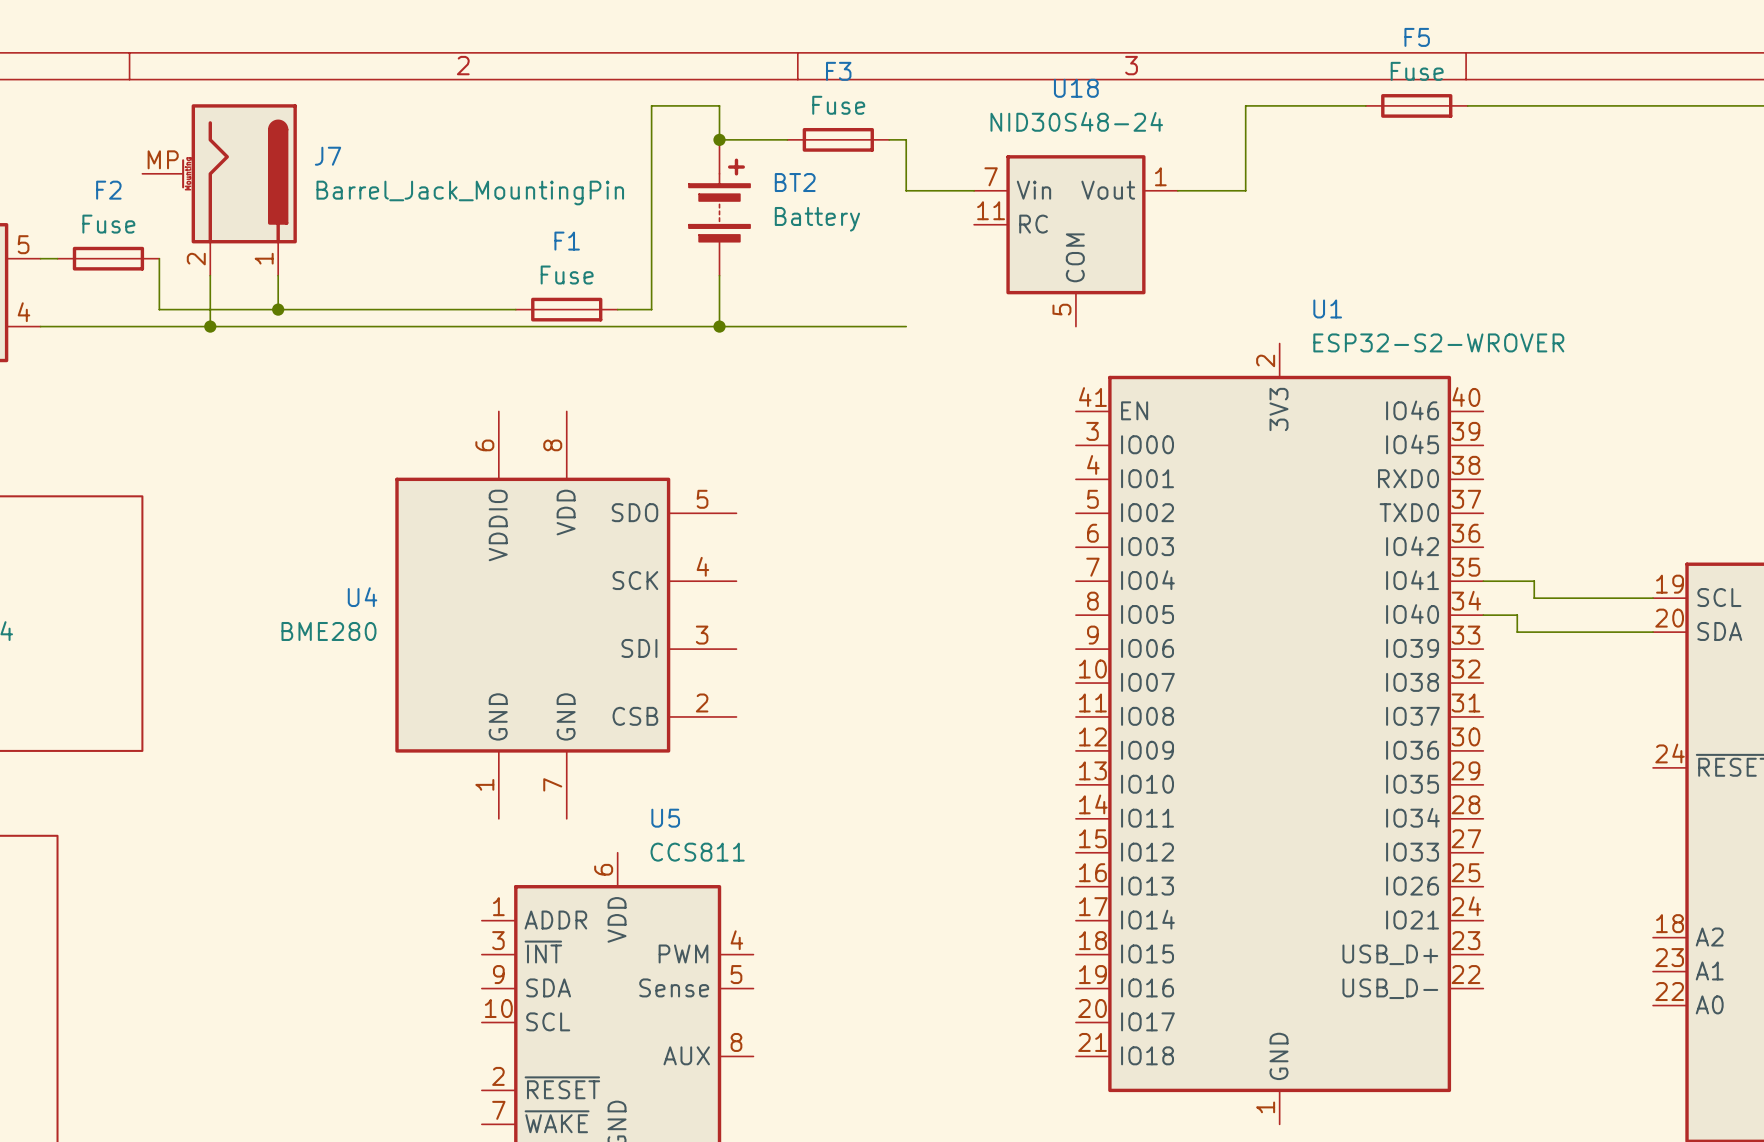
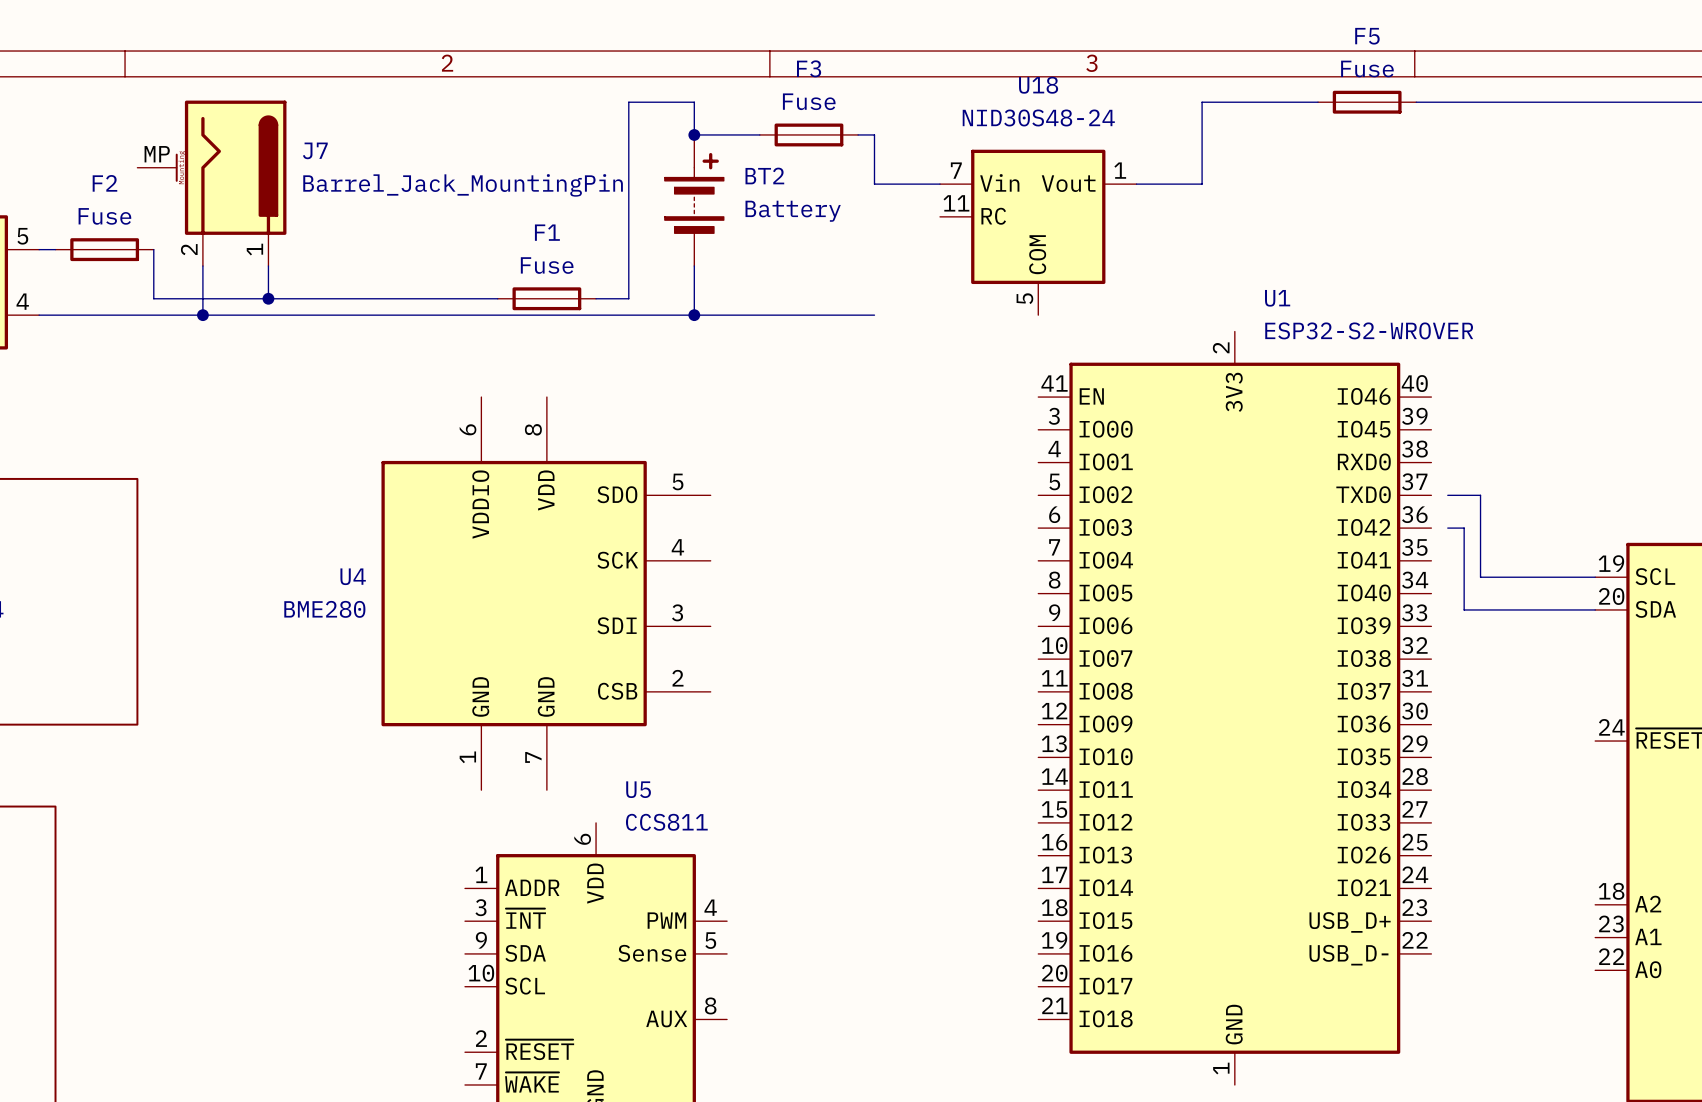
wire: (1483, 581) (1534, 581) -> (1447, 495) (1480, 495) (1480, 560)
wire: (1483, 615) (1517, 615) -> (1447, 528) (1464, 528) (1464, 593)

